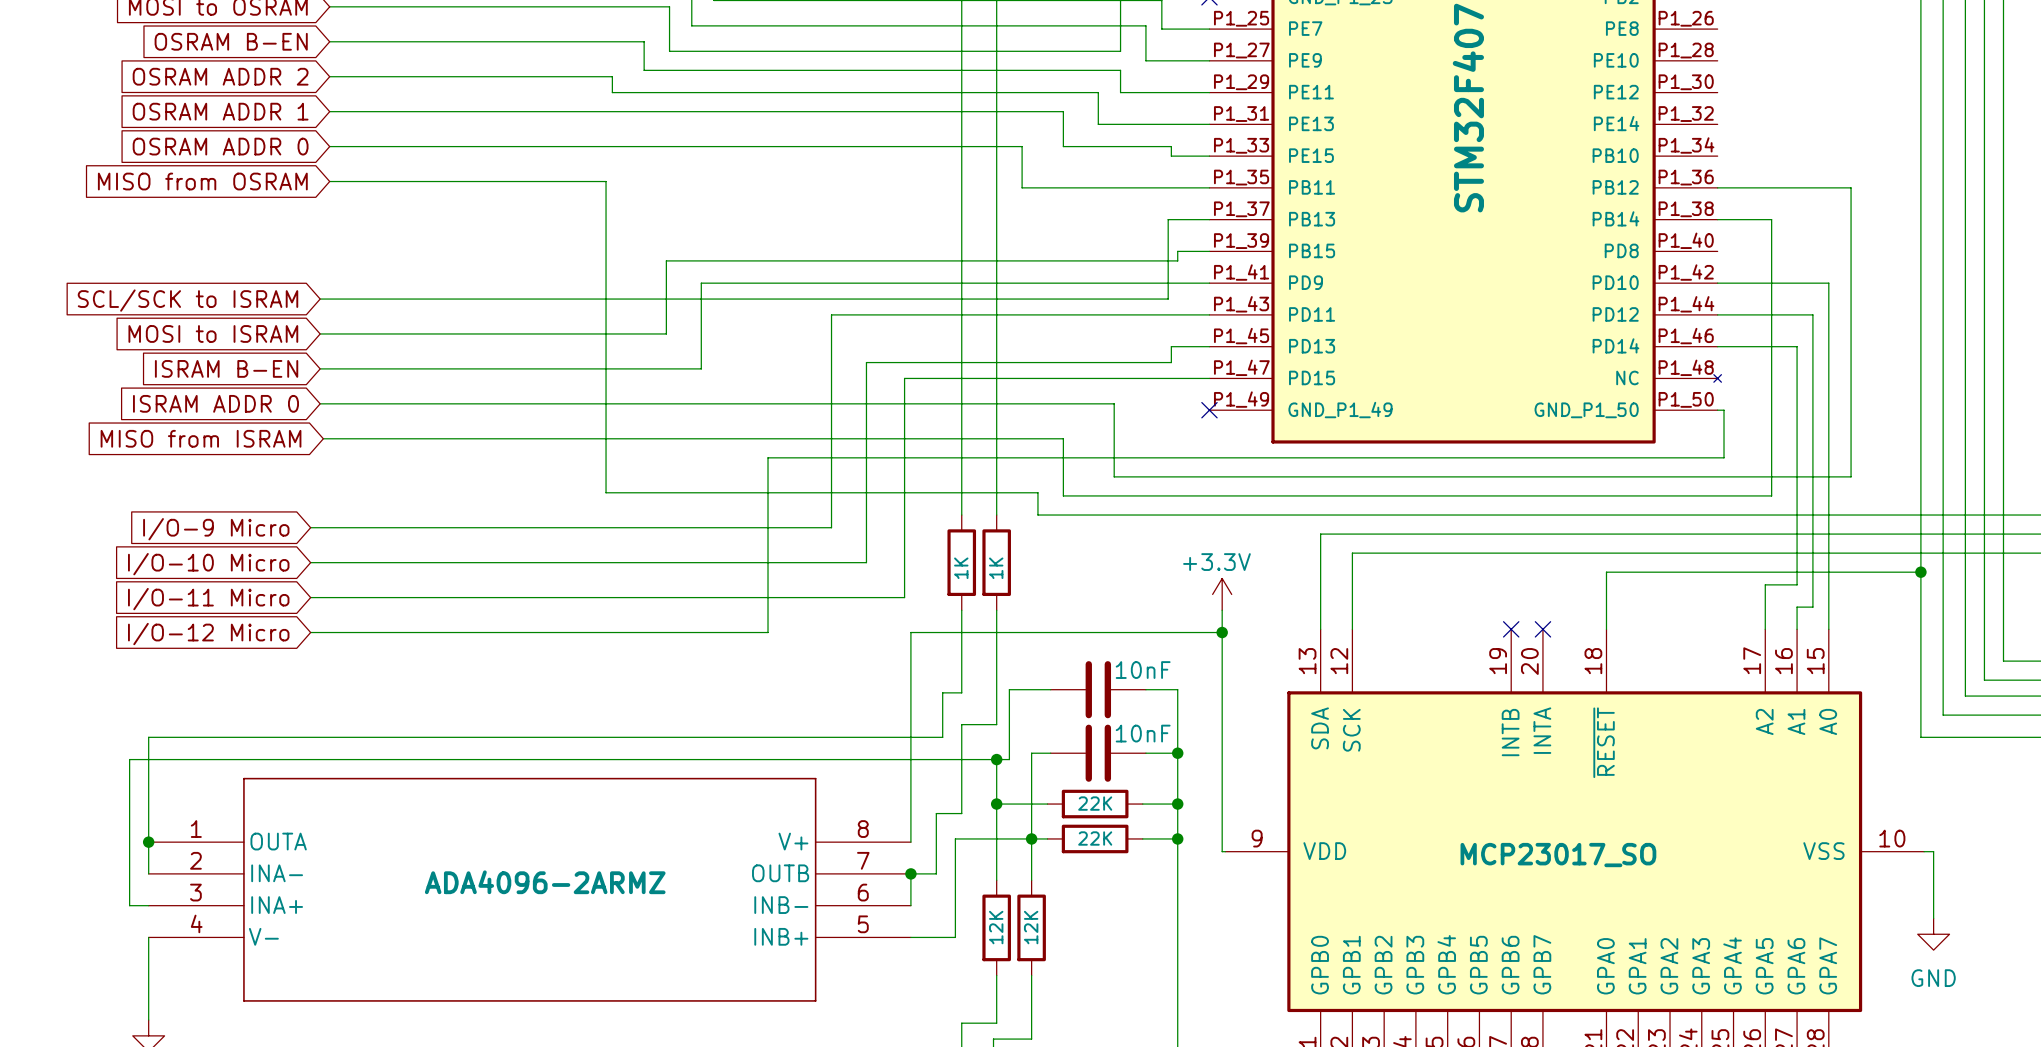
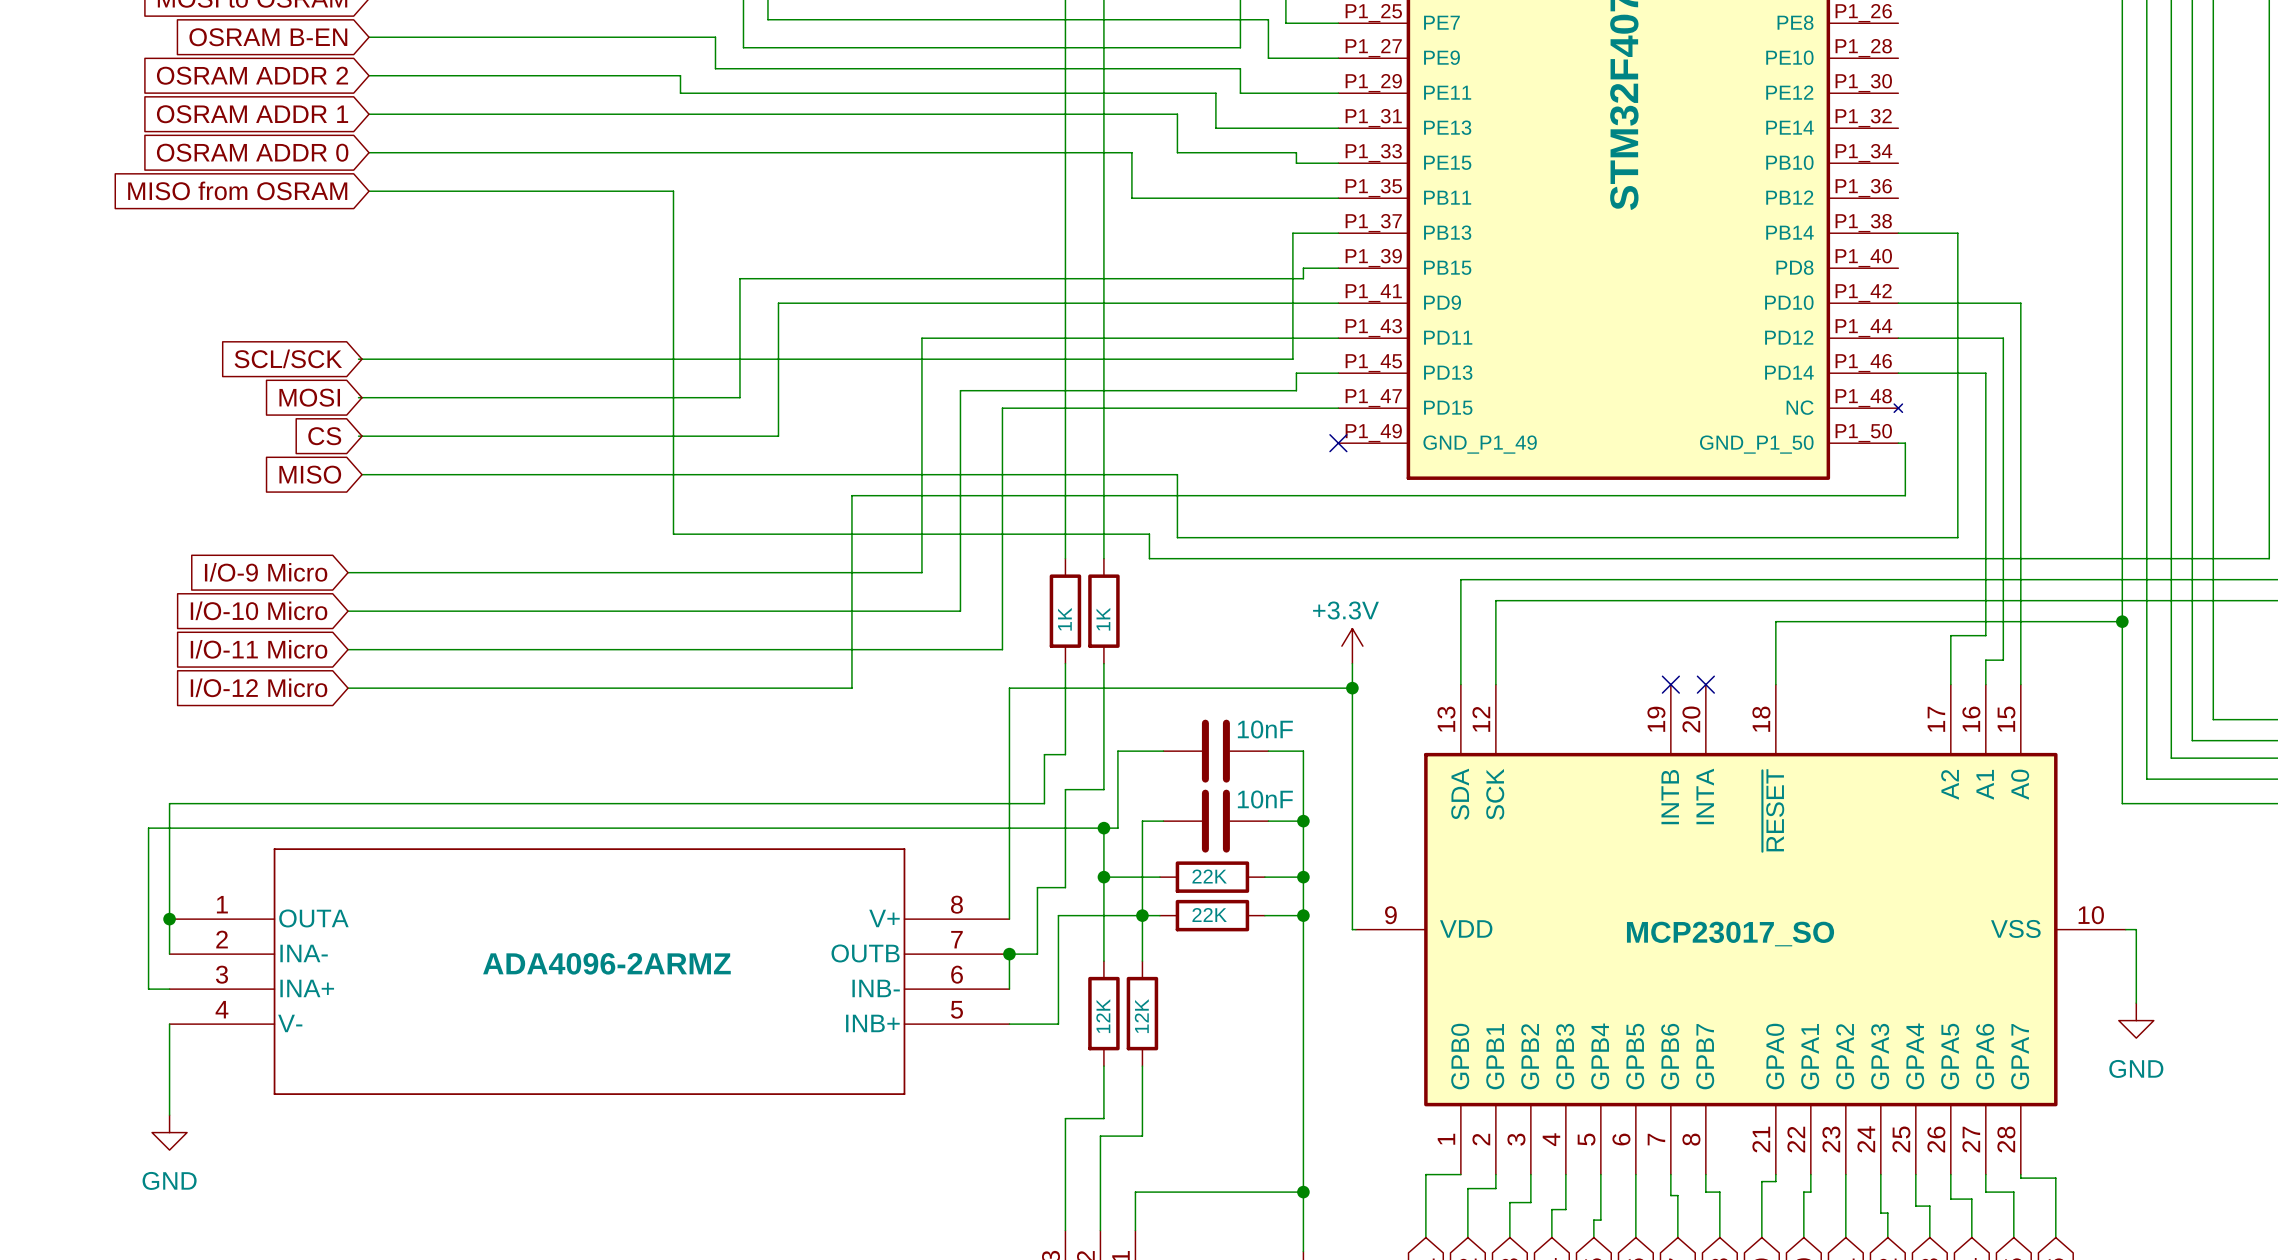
wire: (1717, 187) (1851, 187) (1851, 476) (1114, 476) (1114, 403) (701, 403) -> none
wire: (320, 299) (1168, 299) -> (739, 397) (739, 359) (1292, 359) (1292, 320)
global label: SCL/SCK to ISRAM (188, 300) -> none
global label: MOSI to ISRAM (213, 333) -> SCL/SCK (288, 358)
global label: ISRAM B-EN (226, 368) -> MOSI (309, 397)
wire: (666, 368) (701, 368) -> (778, 436) (778, 397)
global label: ISRAM ADDR 0 (215, 403) -> CS (324, 436)
global label: MISO from ISRAM (201, 438) -> MISO (310, 474)

